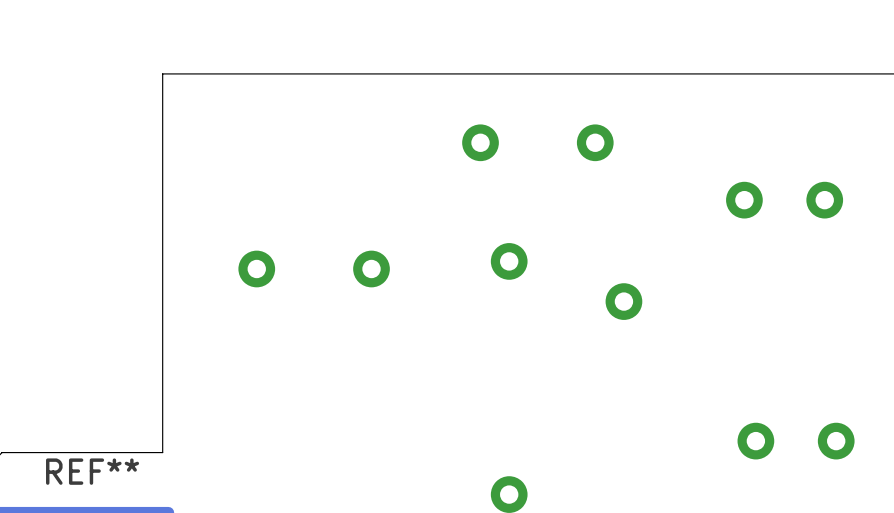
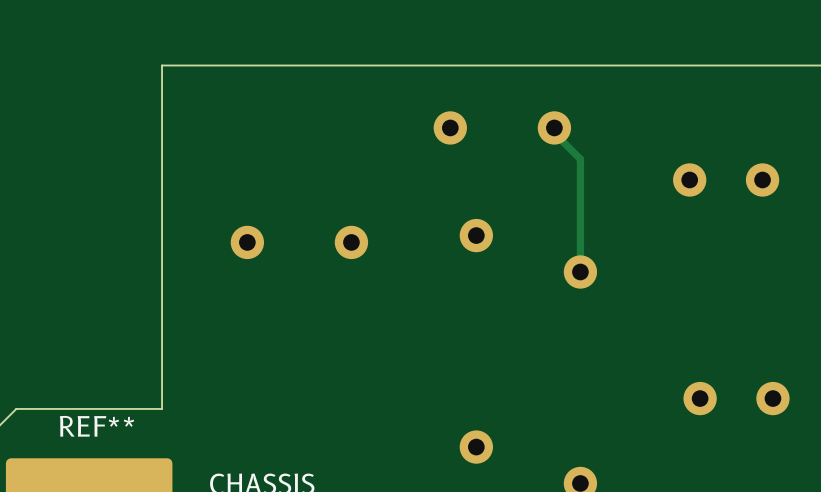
track: none -> (554, 127) (554, 133) (580, 159) (580, 271)

